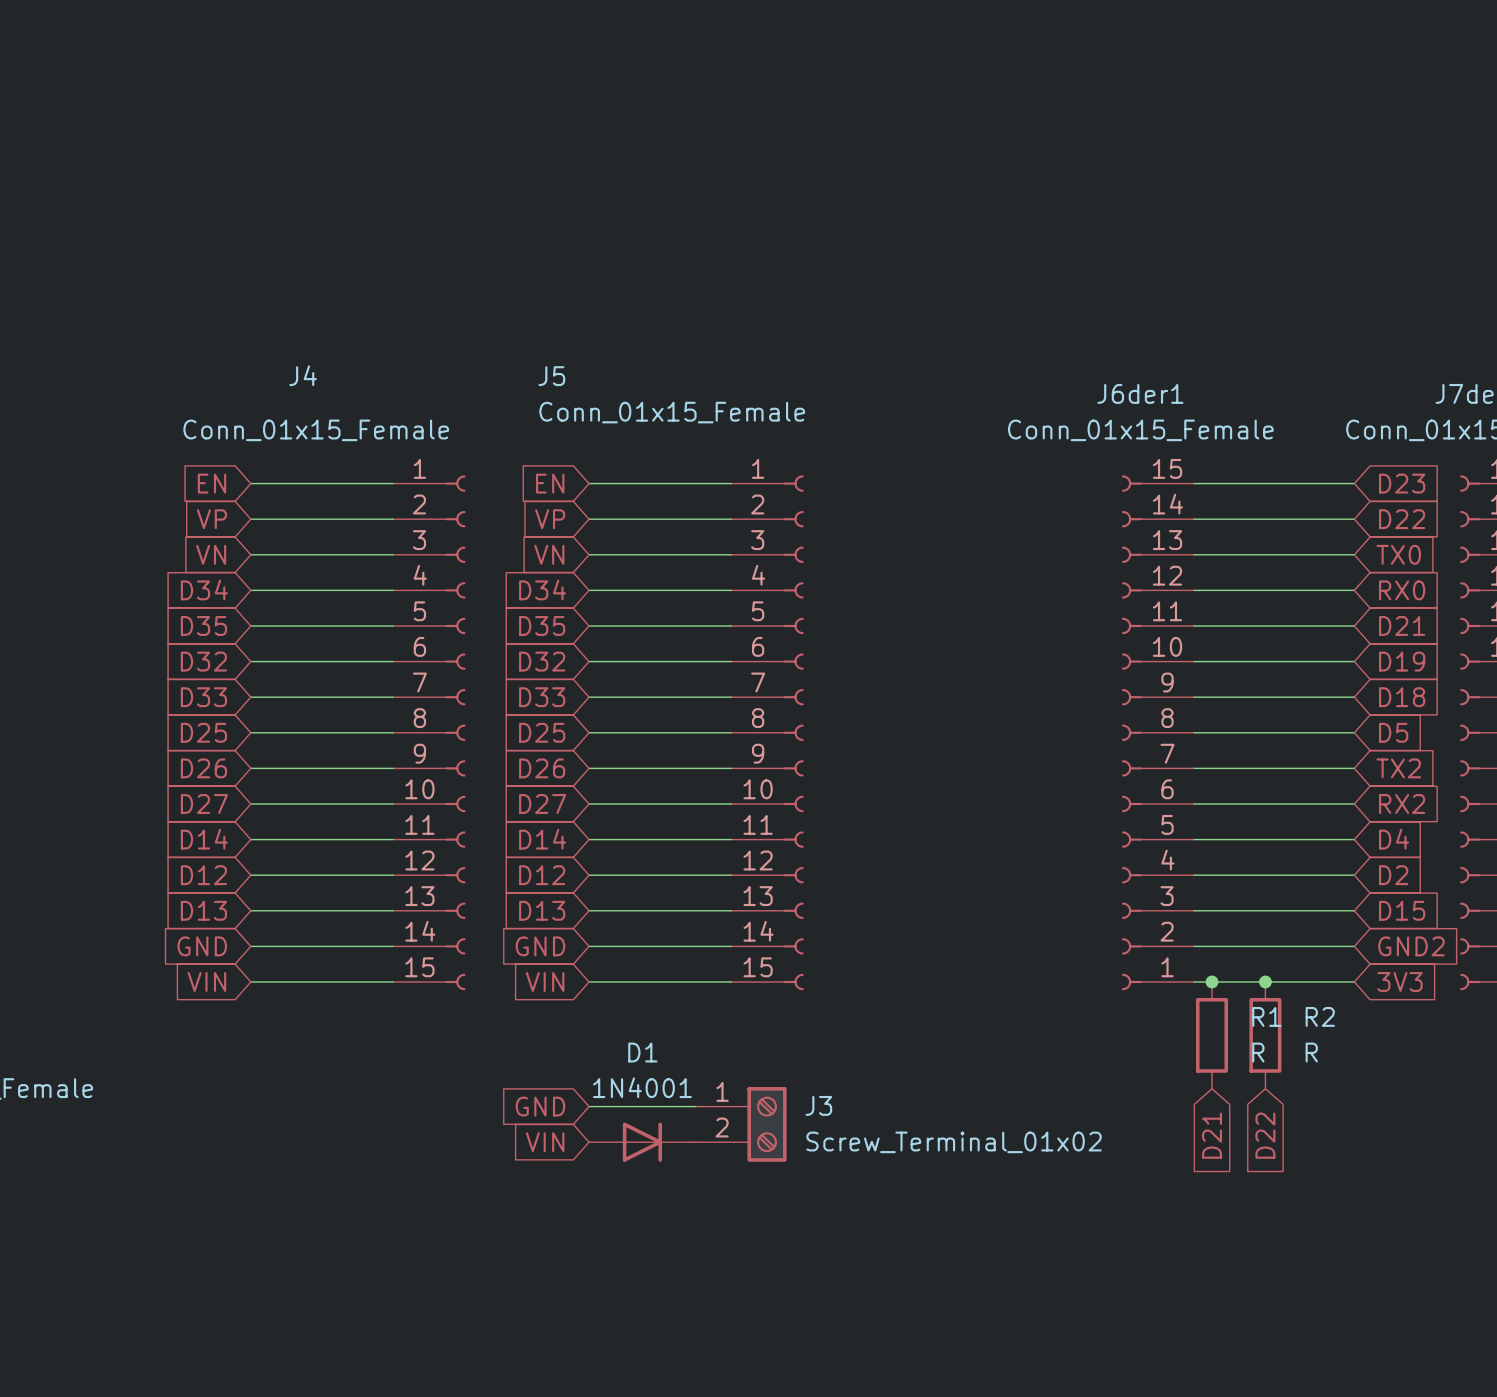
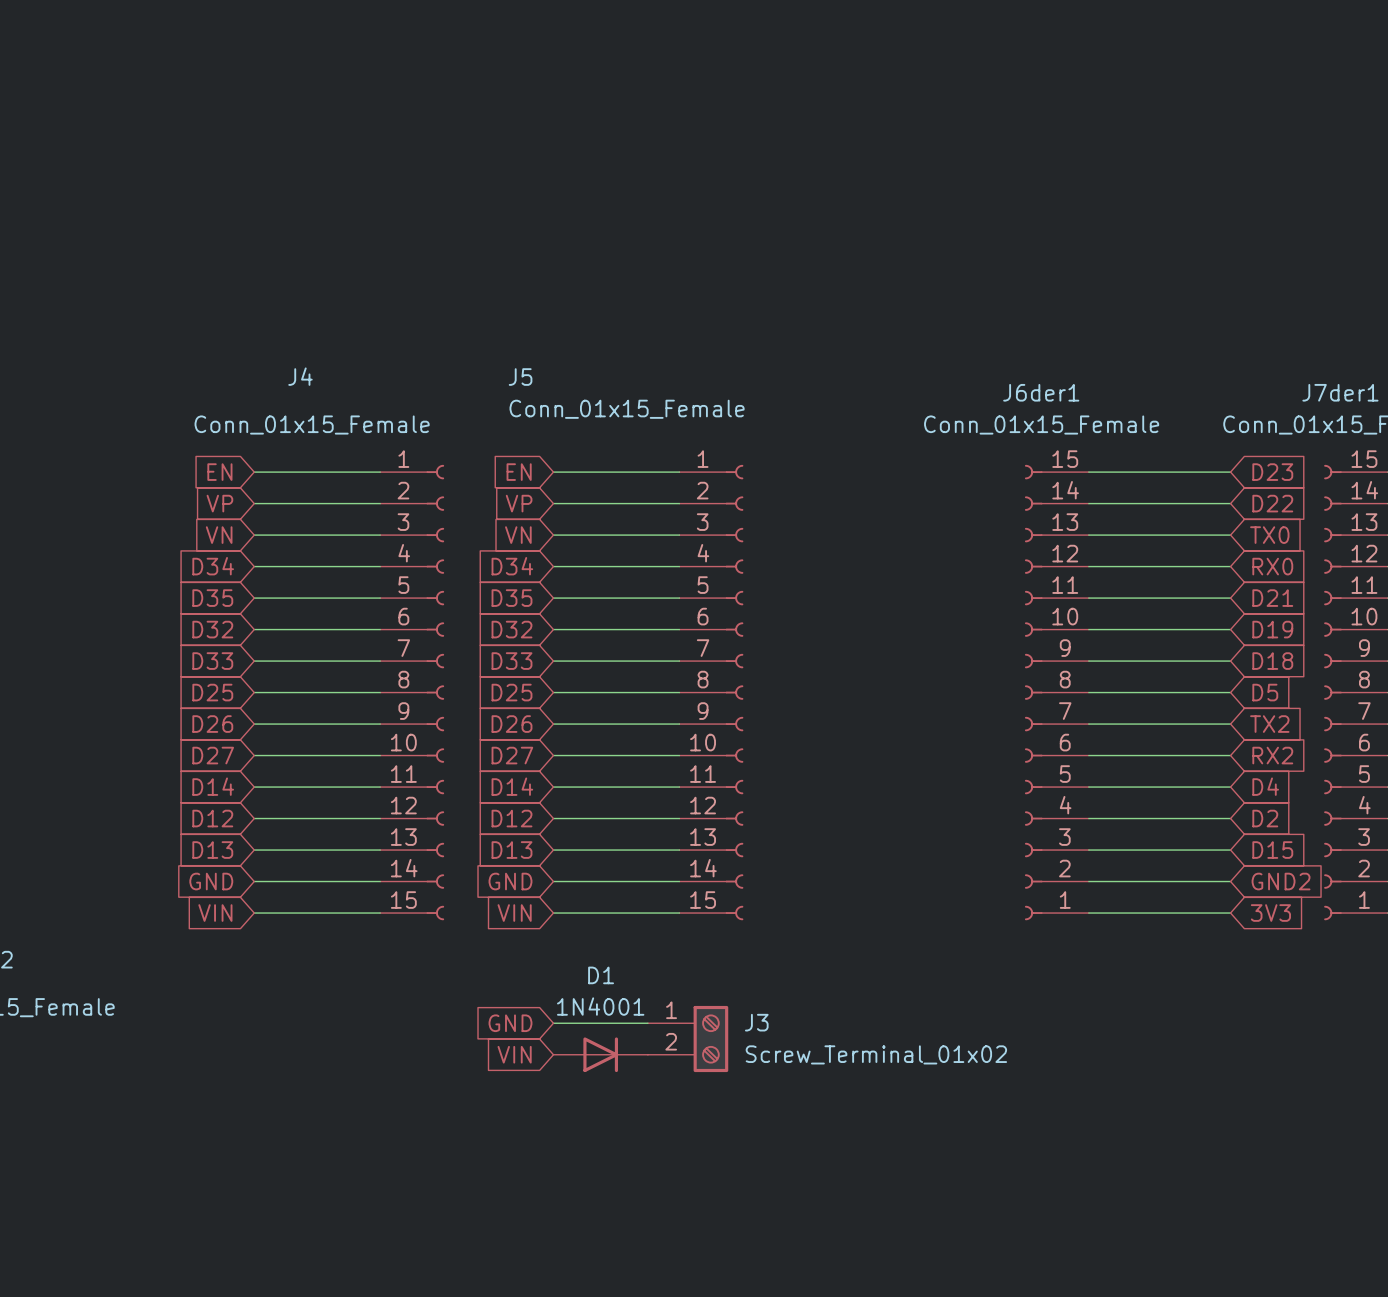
junction: (1212, 981) -> none
junction: (1265, 981) -> none
R1: R (1212, 1035) -> none
R2: R (1265, 1035) -> none
global label: D21 (1212, 1135) -> none
global label: D22 (1265, 1135) -> none

